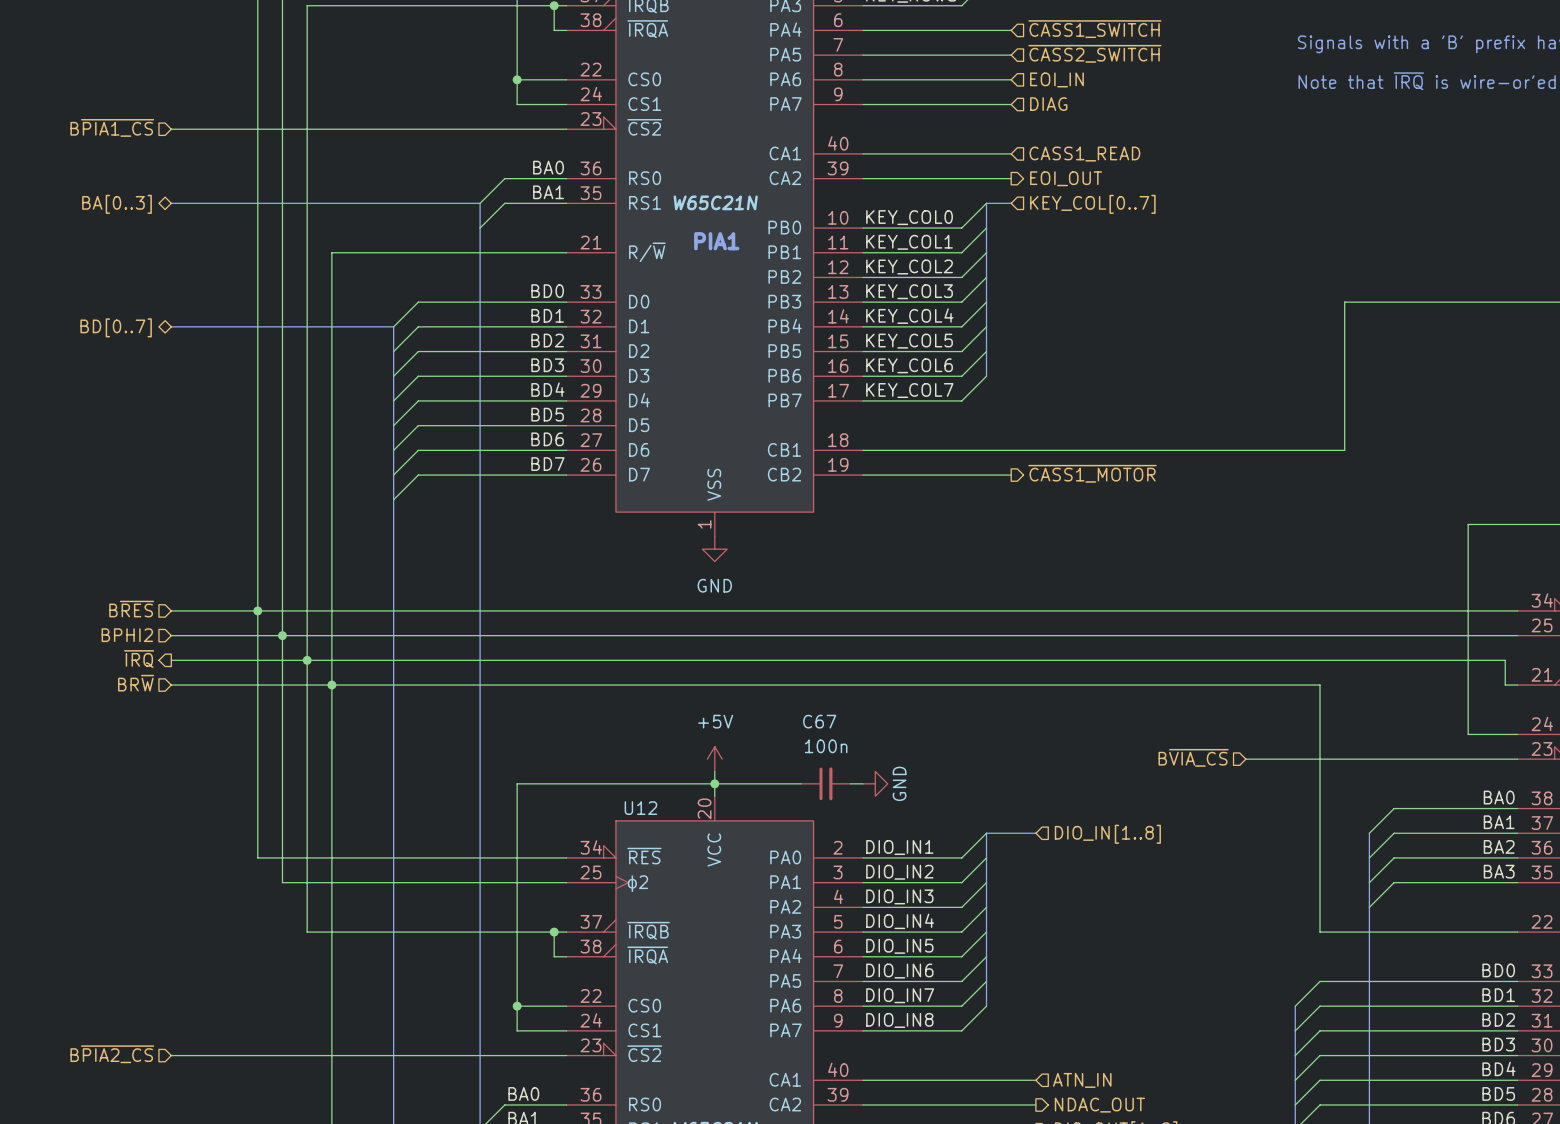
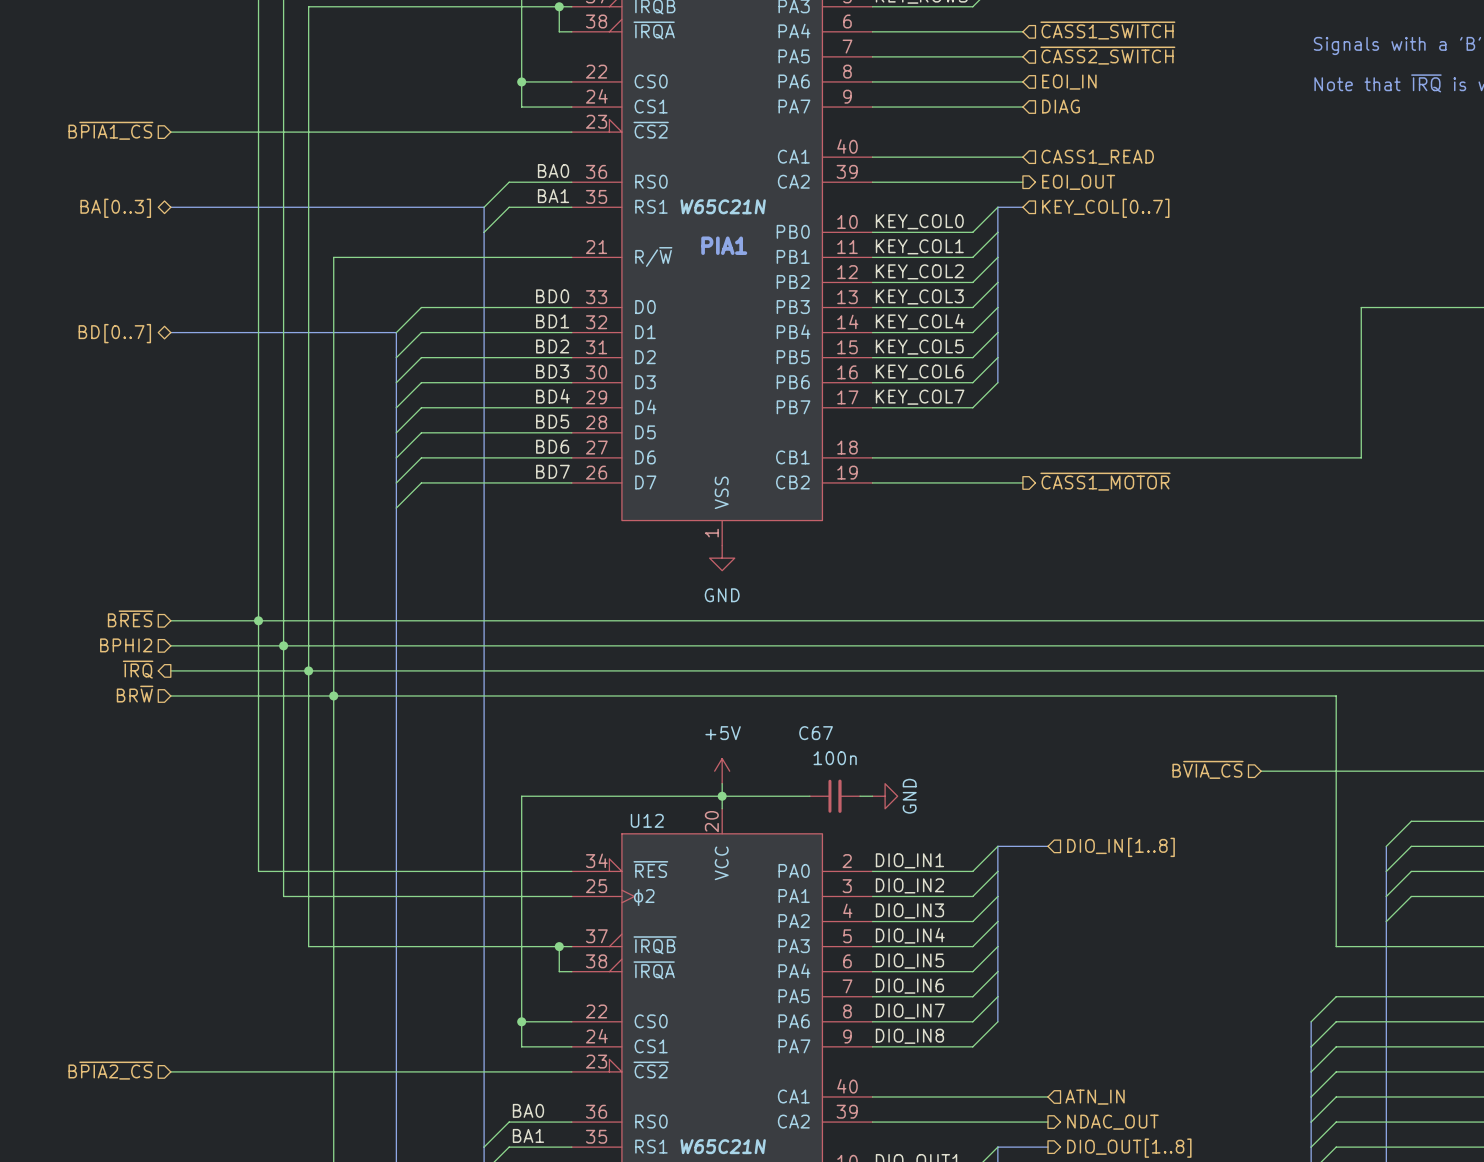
C67 name position: C67 (819, 721) -> C67 (816, 733)

